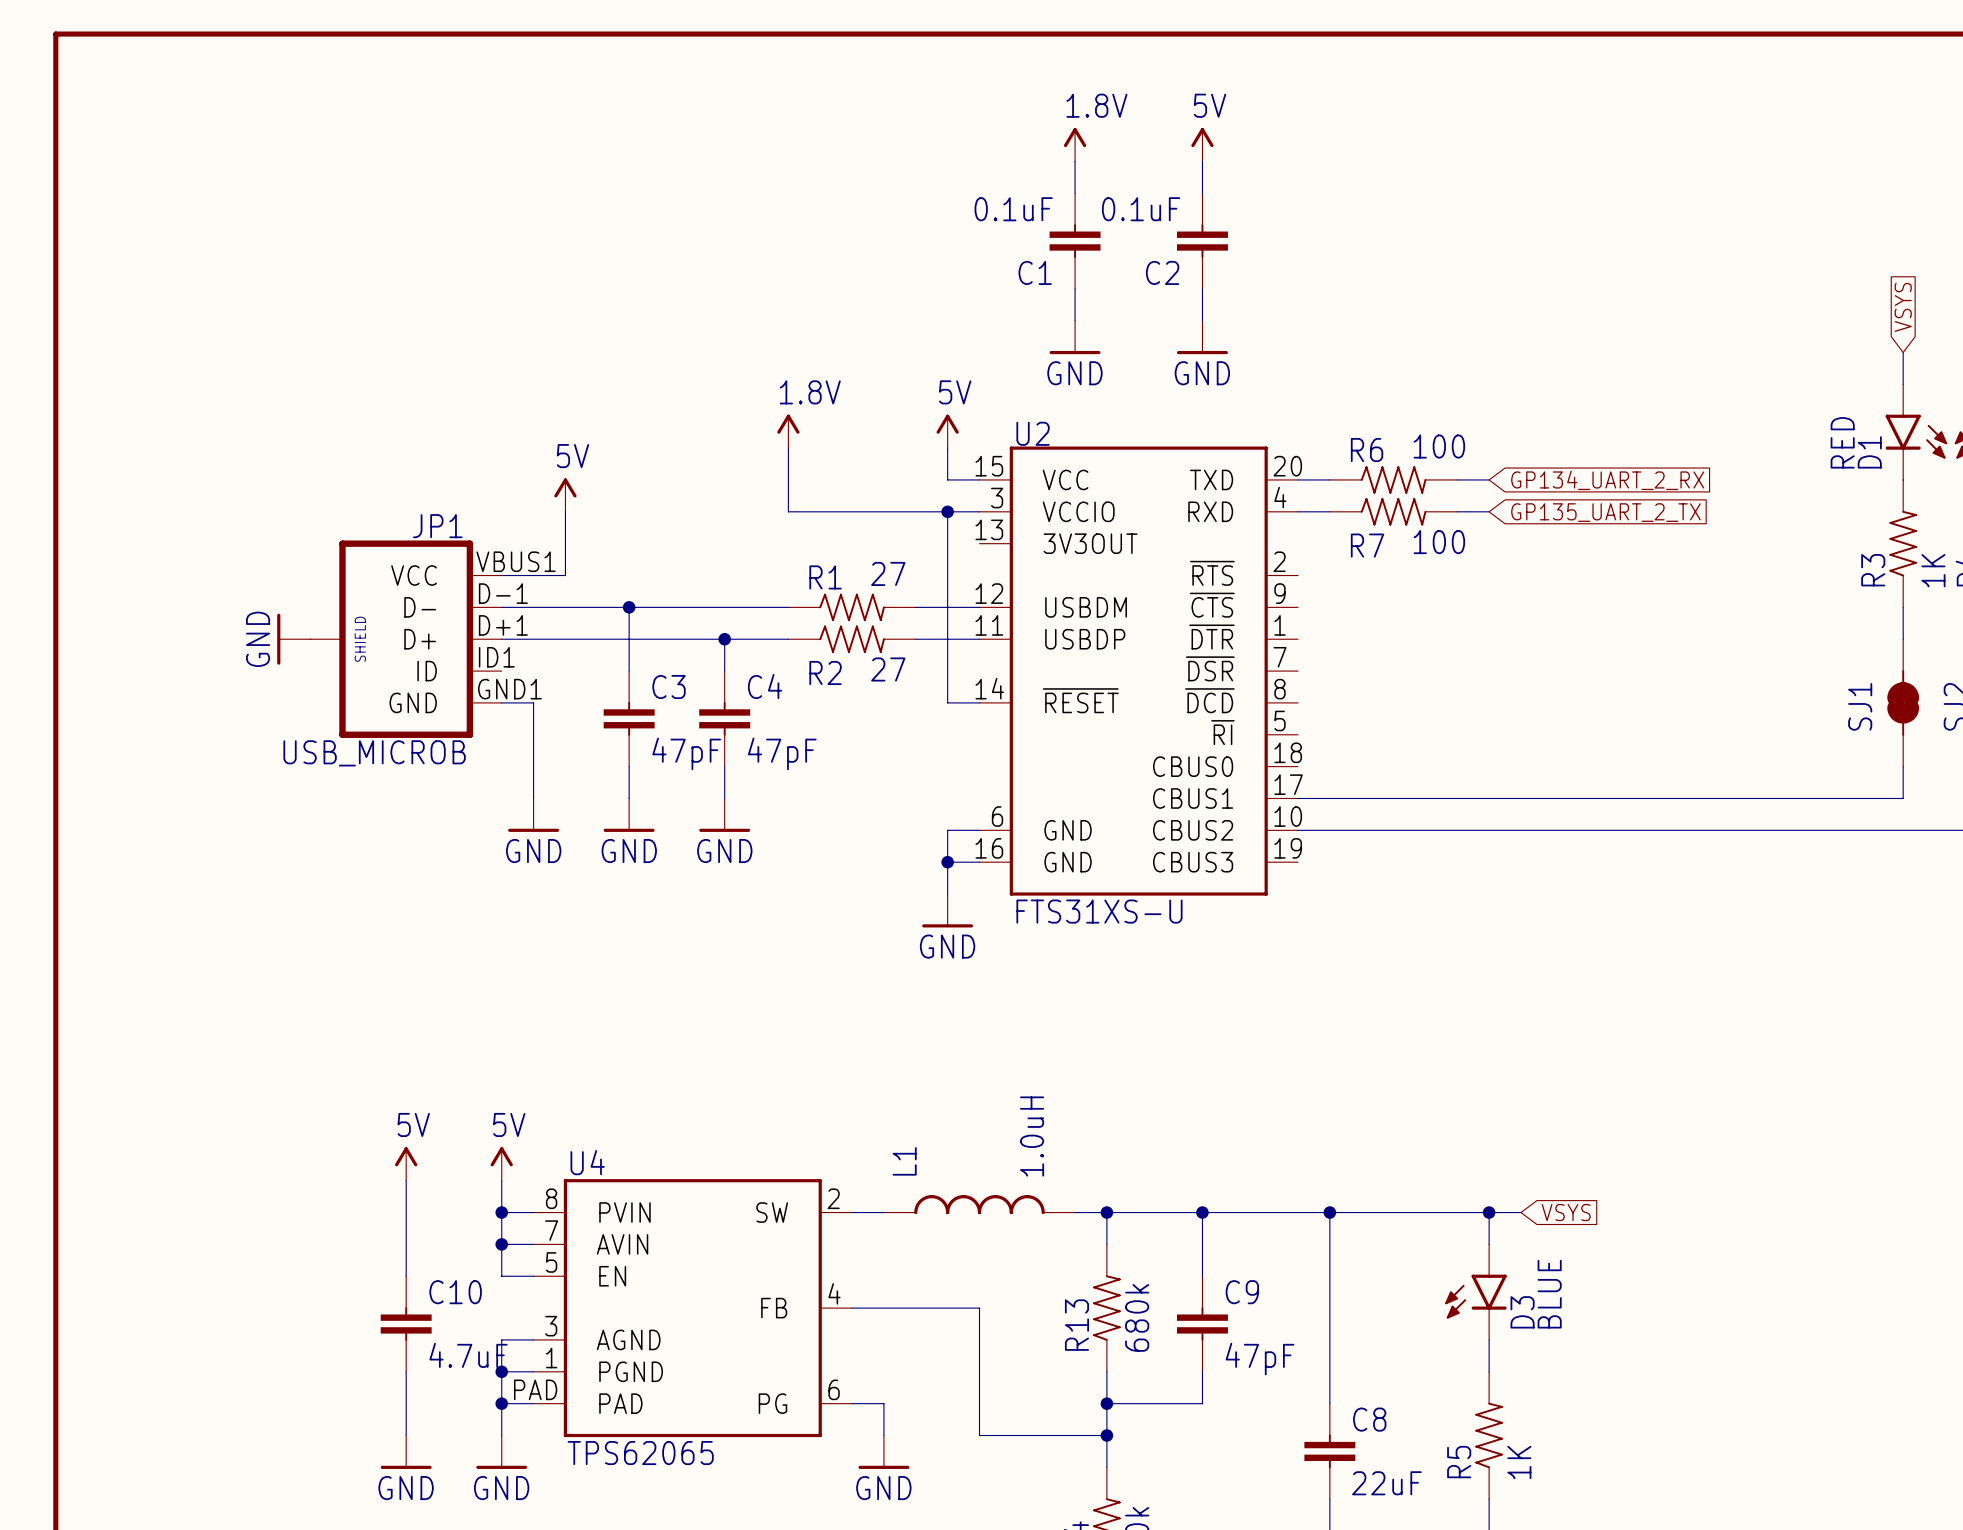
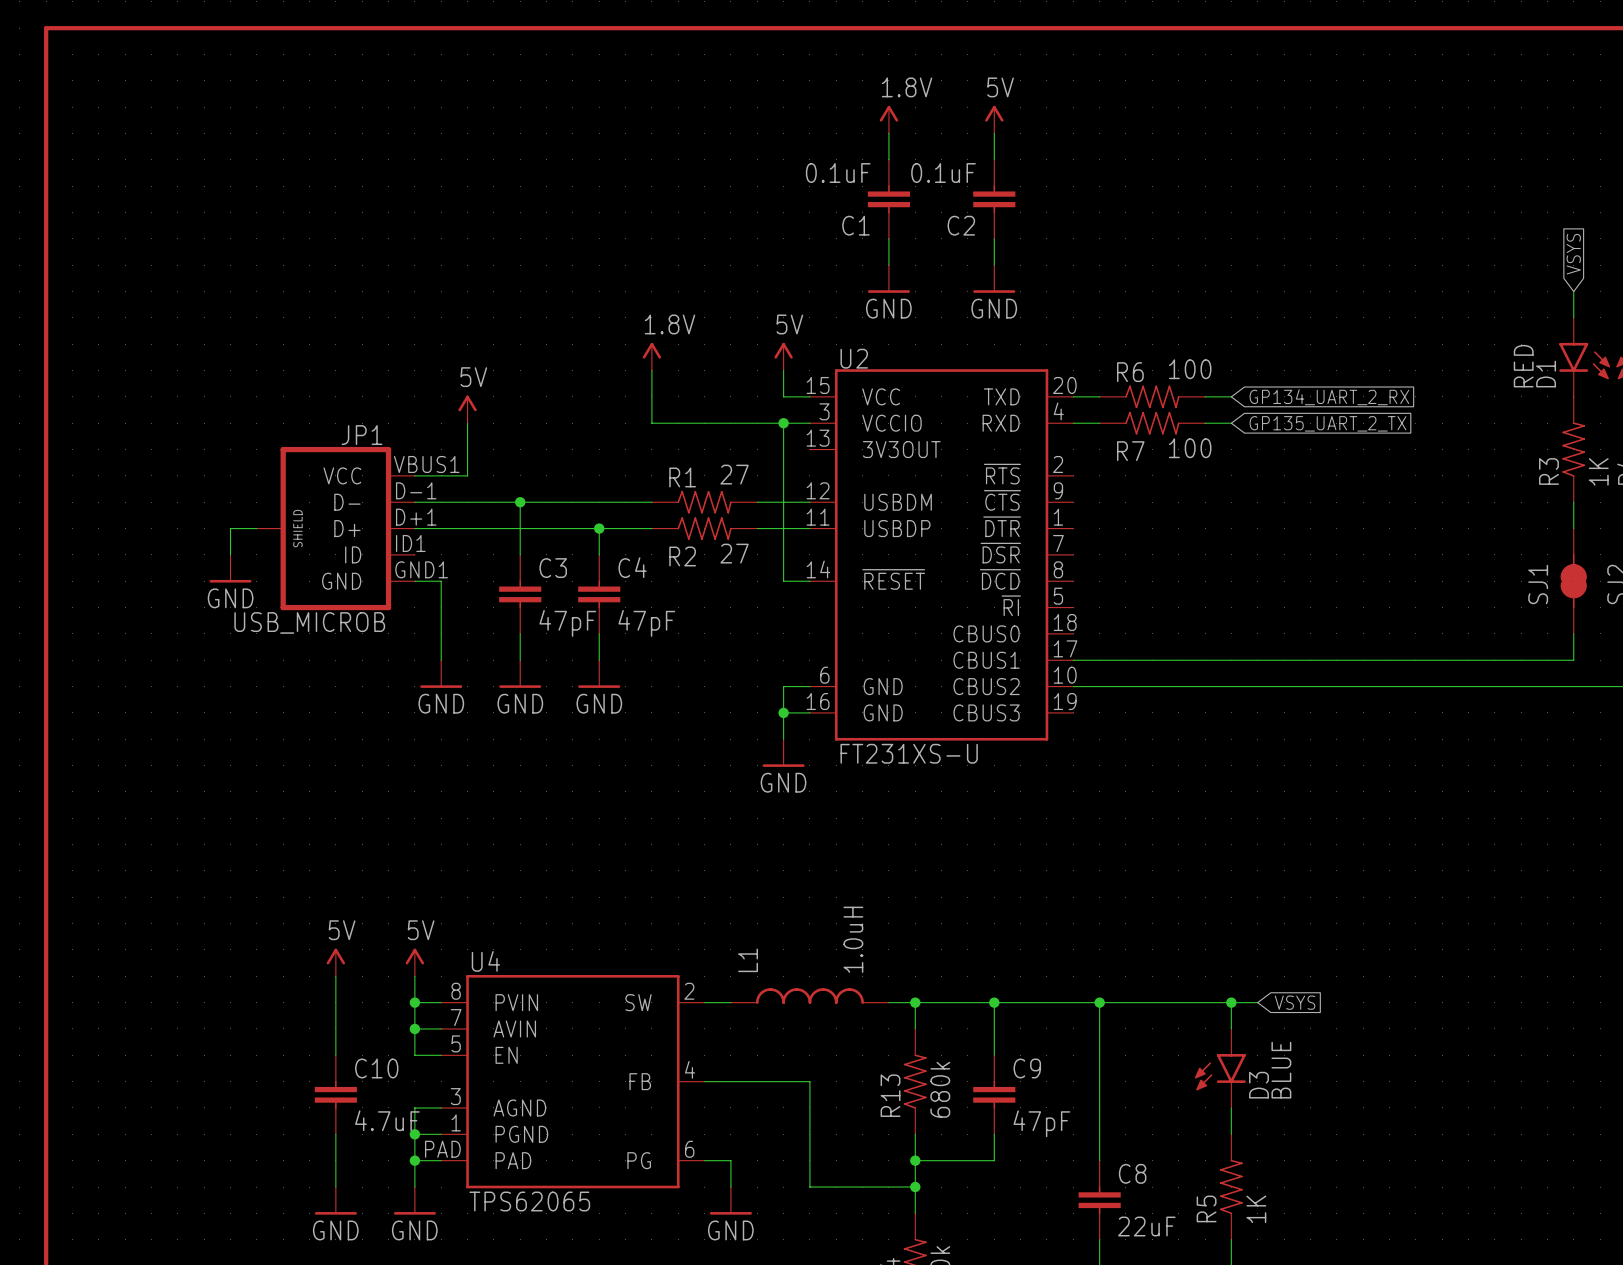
power symbol rotation: 0° (278, 639) -> 90° counterclockwise (230, 581)
power symbol position: GND (293, 639) -> GND (230, 568)
U2 value: FTS31XS-U (1099, 911) -> FT231XS-U (909, 753)

